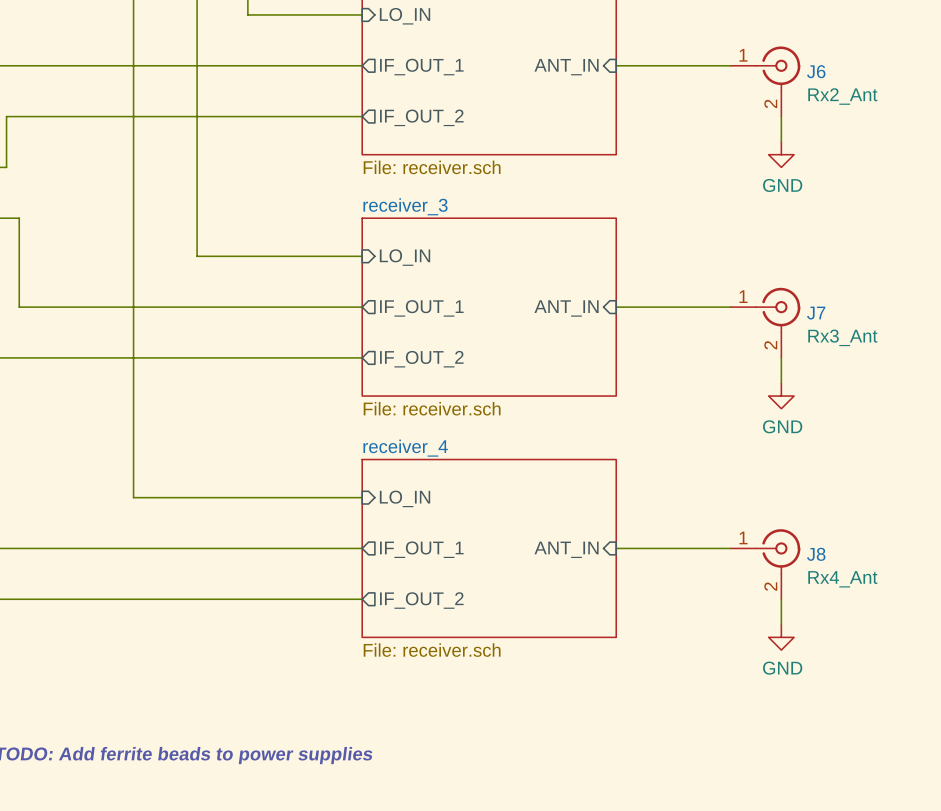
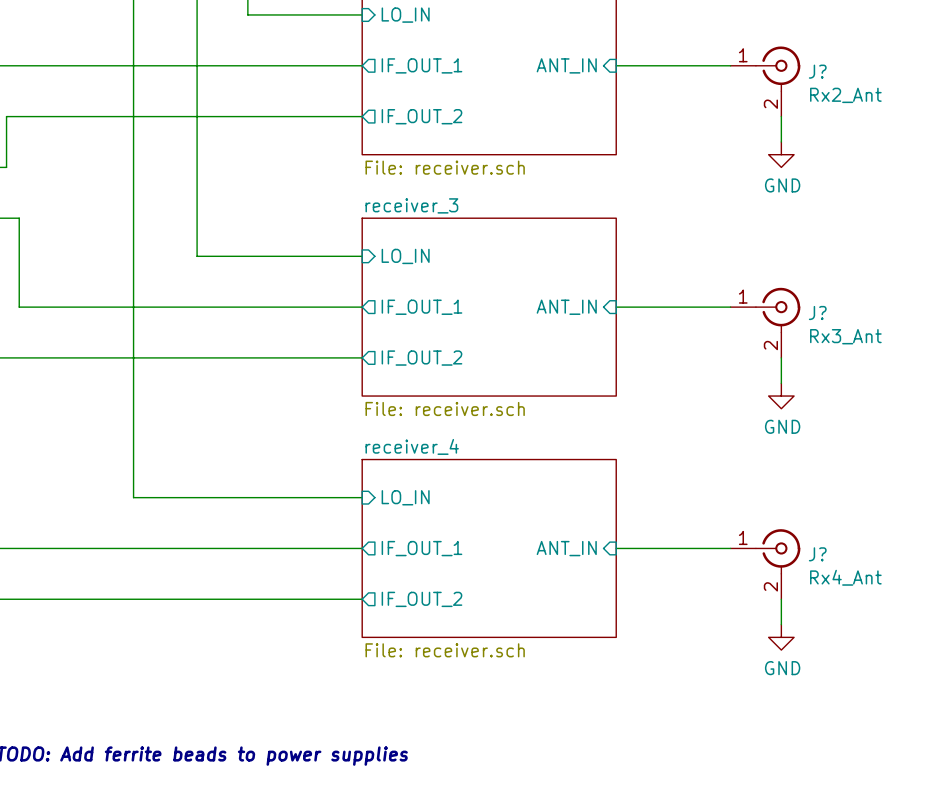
J6 name: J6 (816, 71) -> J? (817, 71)
J7 name: J7 (816, 313) -> J? (817, 312)
J8 name: J8 (816, 554) -> J? (817, 554)

